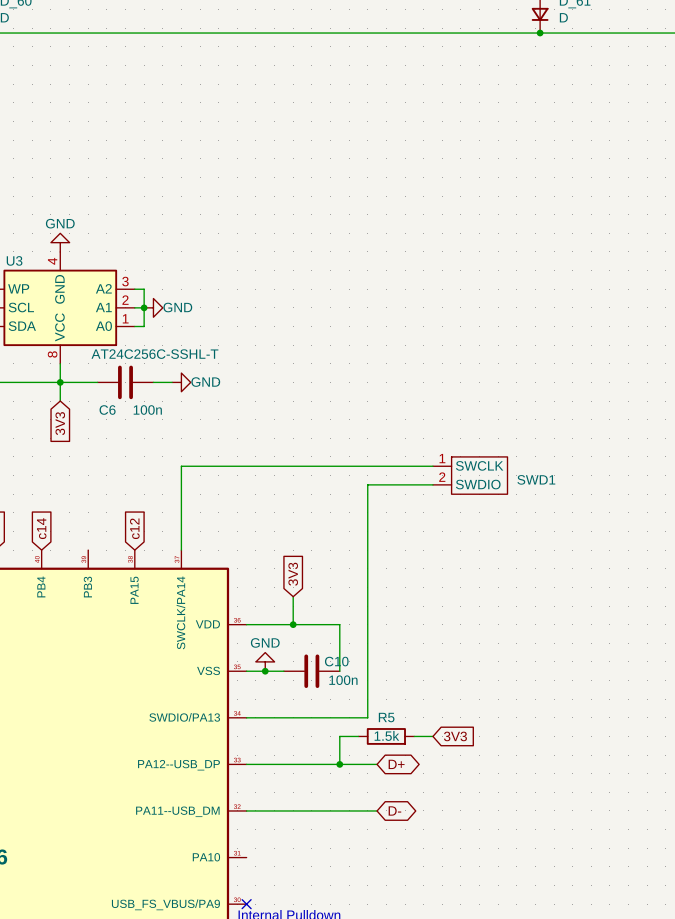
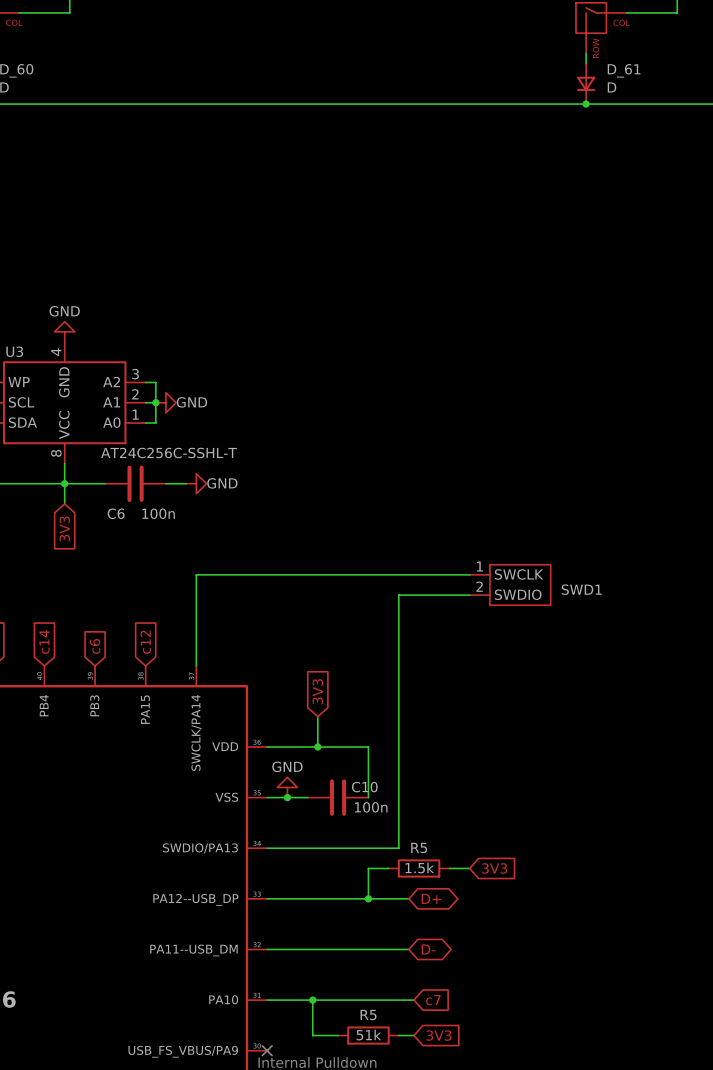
global label: none -> c6 (95, 646)
wire: none -> (267, 1000) (414, 1000)
wire: none -> (312, 1000) (312, 1035) (338, 1035)
junction: none -> (312, 1000)
global label: none -> c7 (433, 1000)
R5: none -> 51k (368, 1035)
wire: none -> (398, 1035) (414, 1035)
global label: none -> 3V3 (438, 1035)

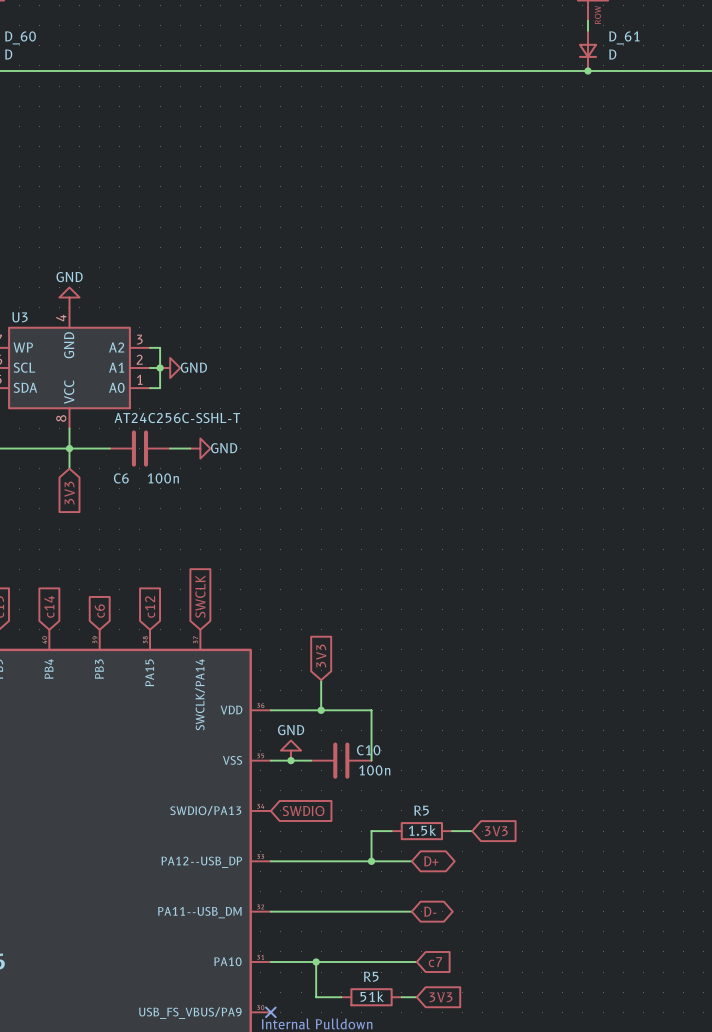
wire: (469, 574) (196, 574) (196, 665) -> none
SWD1: (510, 584) -> none
wire: (469, 595) (398, 595) (398, 848) (267, 848) -> none
global label: none -> SWCLK (200, 596)
global label: none -> SWDIO (303, 811)

